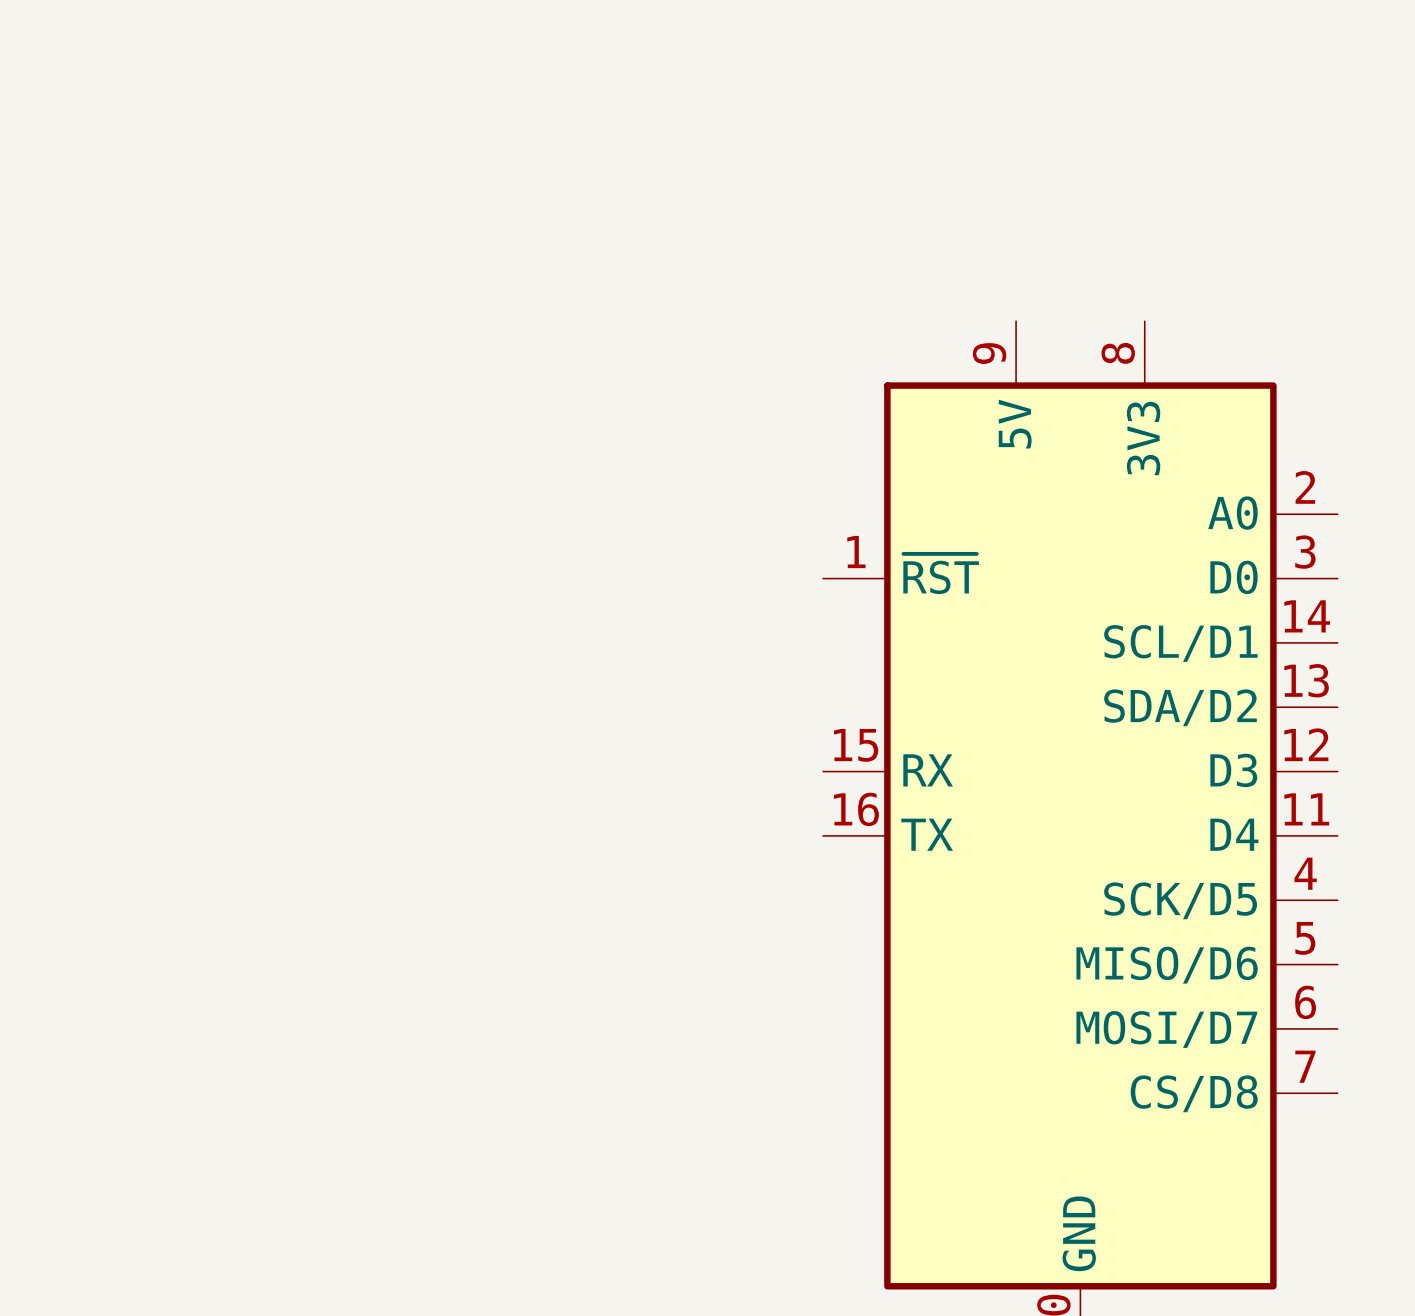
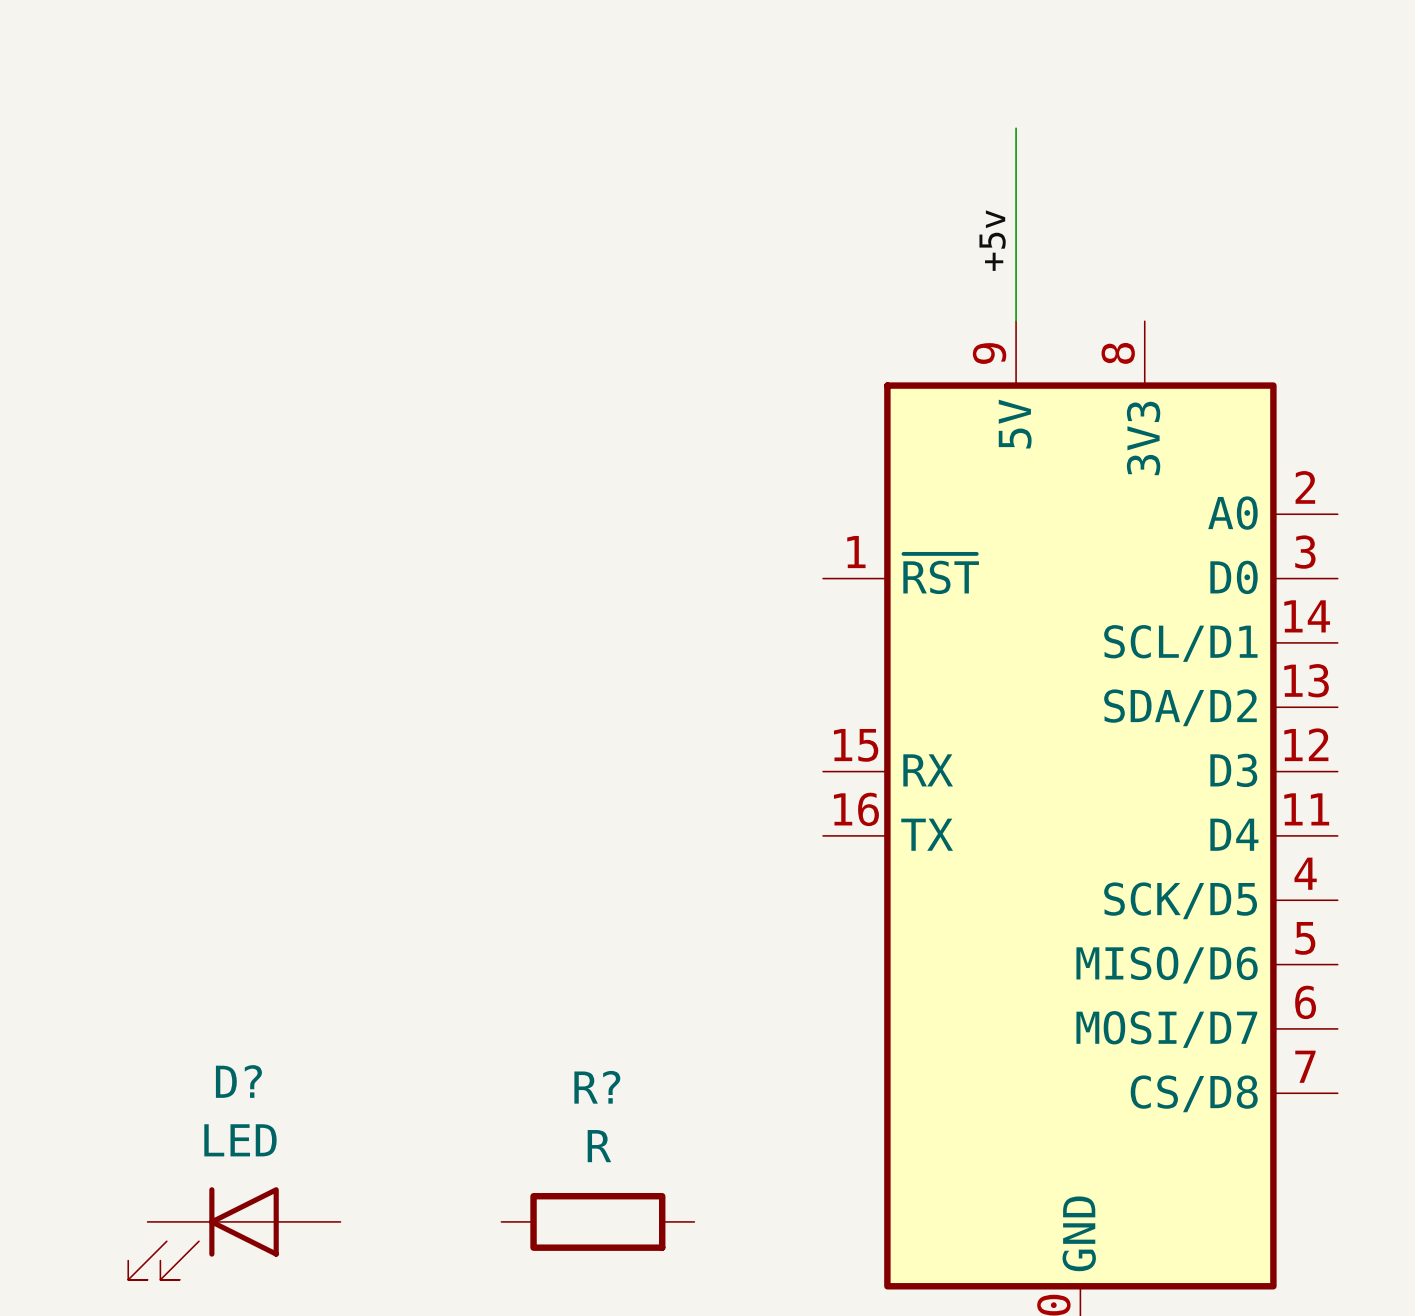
wire: none -> (1016, 128) (1016, 321)
label: none -> +5v (992, 240)
R?: none -> R (597, 1221)
D?: none -> LED (234, 1233)

